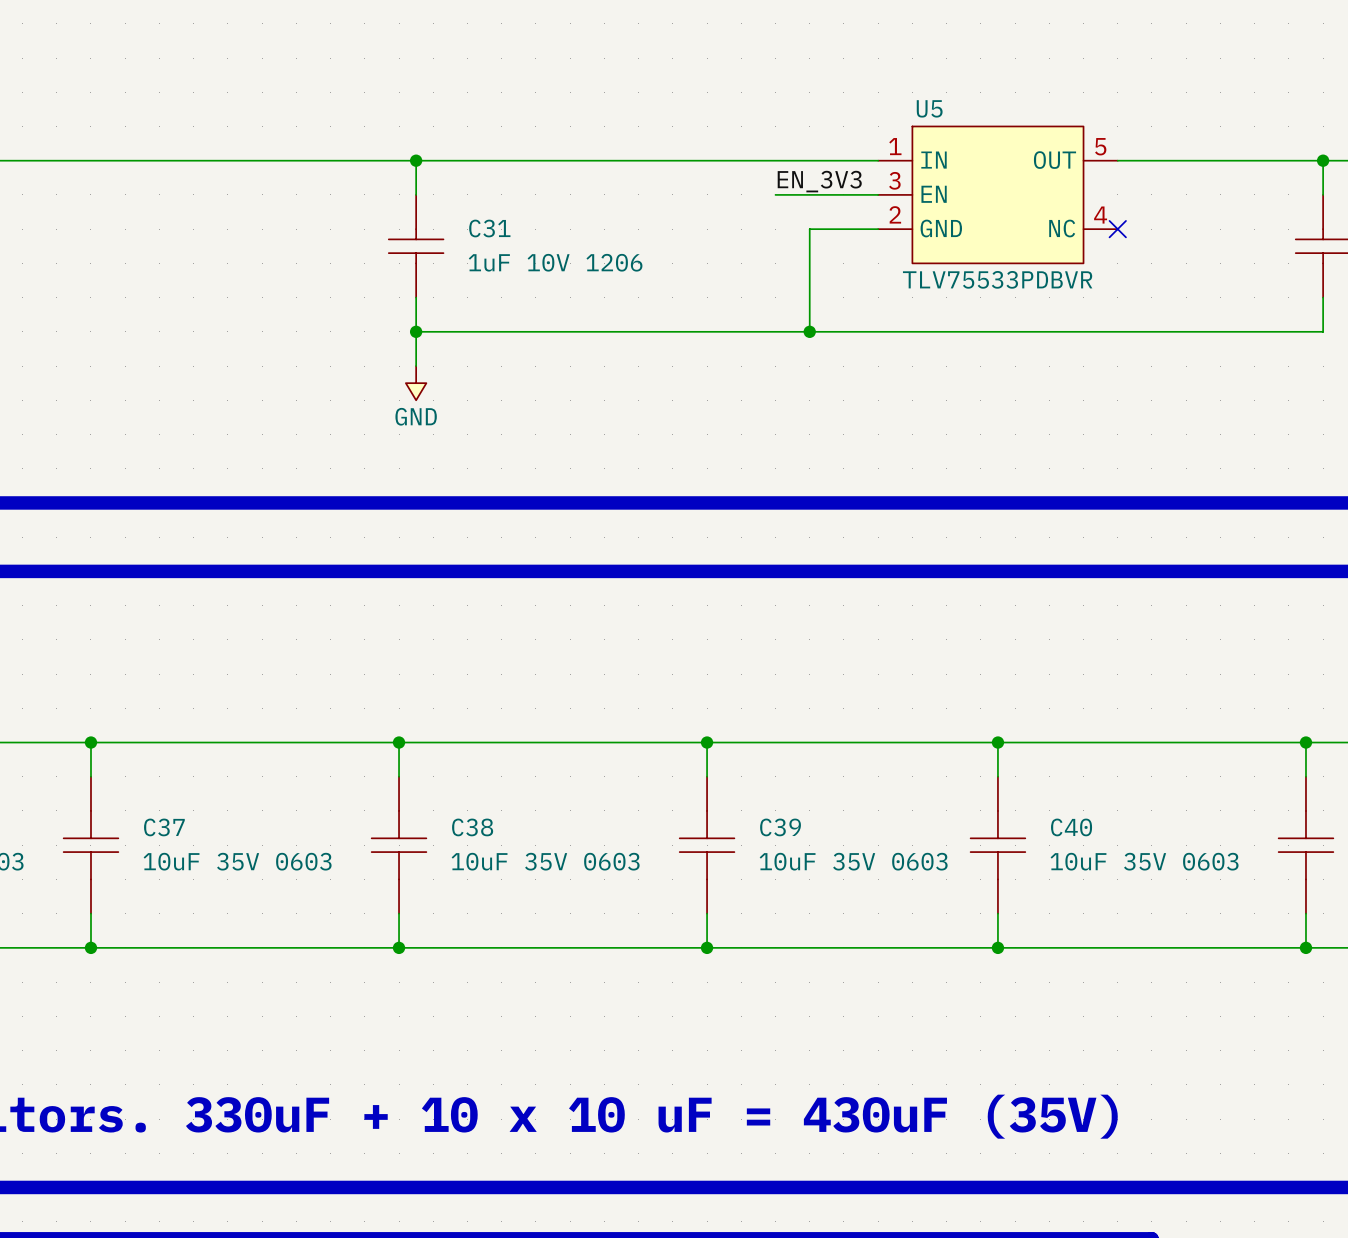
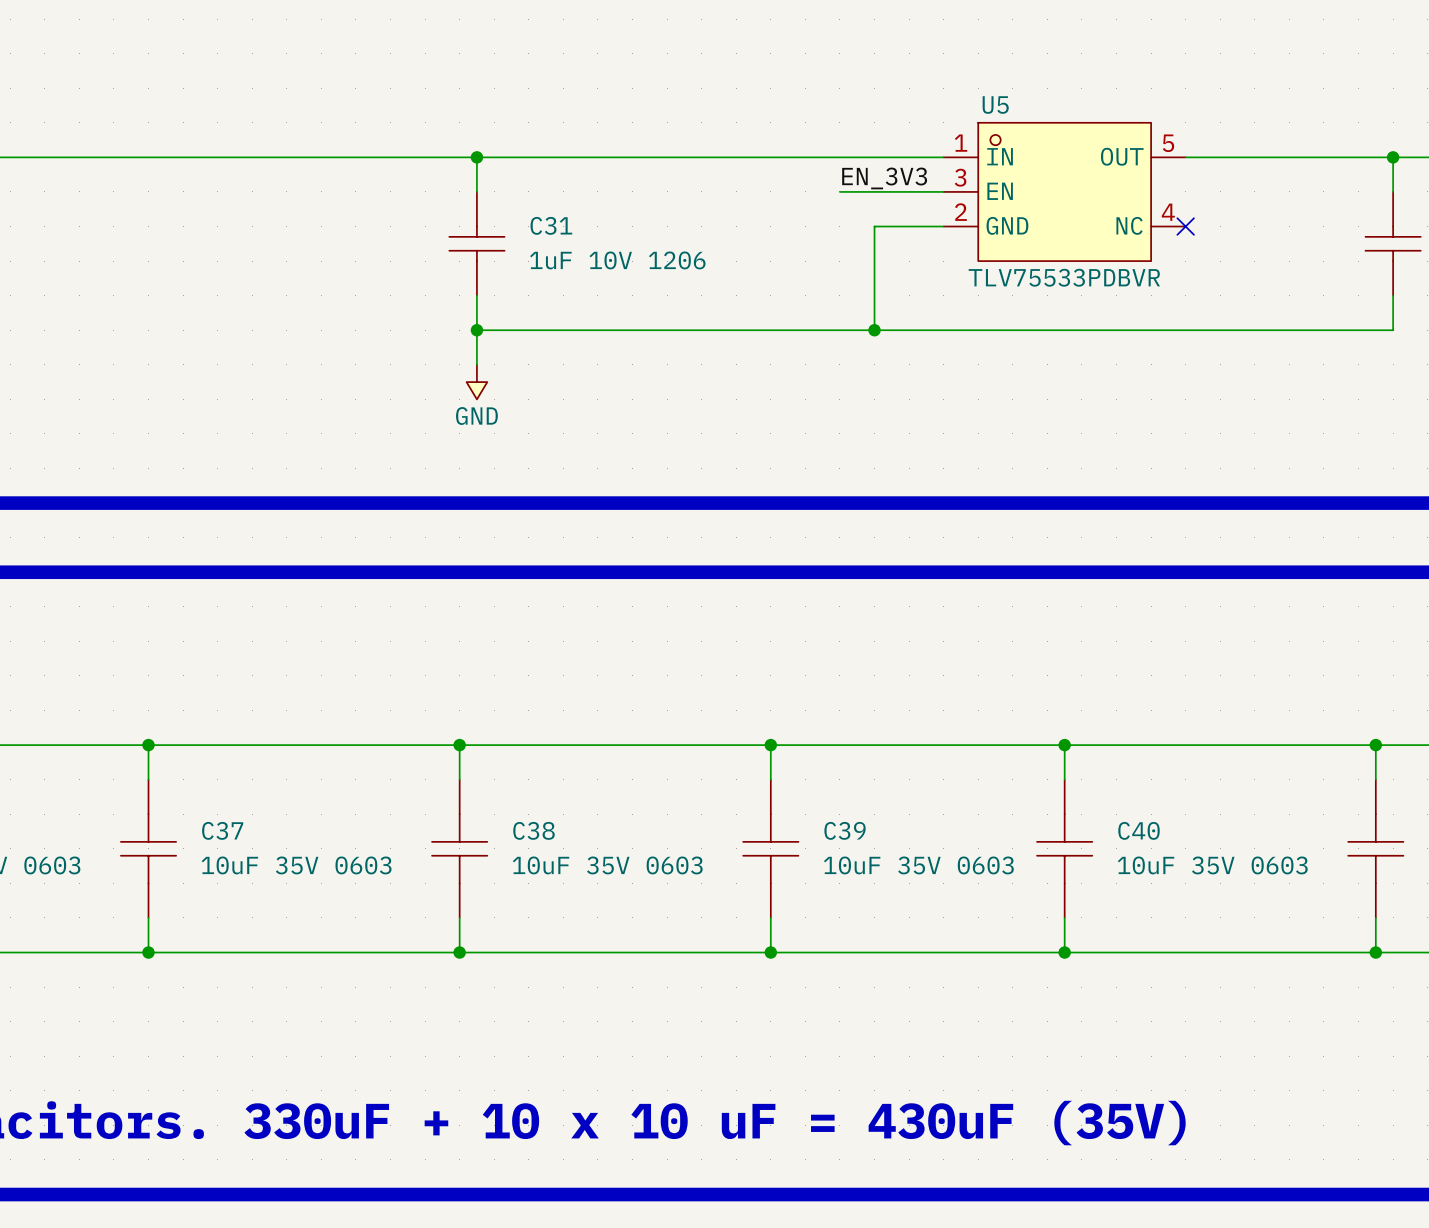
U5 symbol: [878, 126, 1118, 264] -> [943, 122, 1186, 262]

